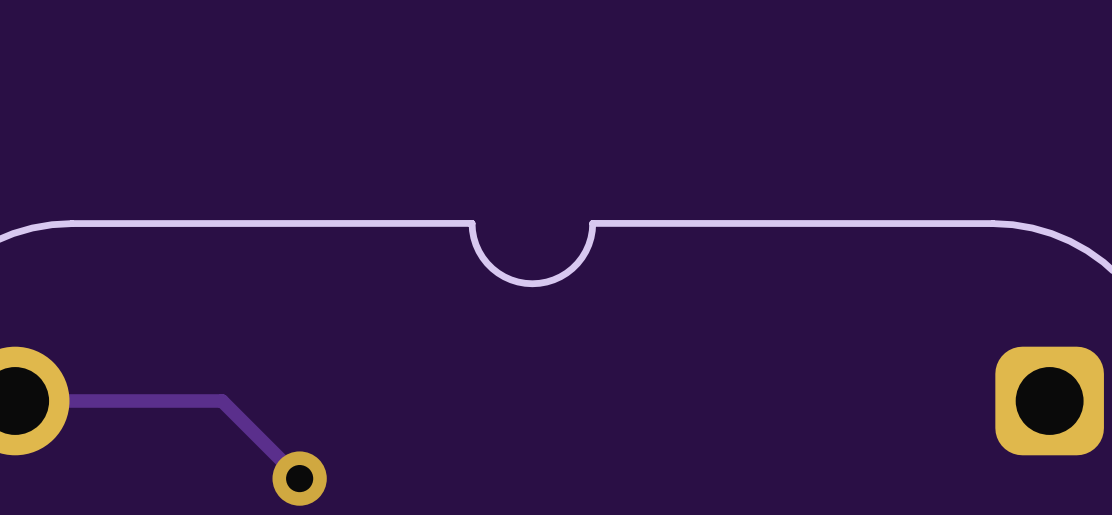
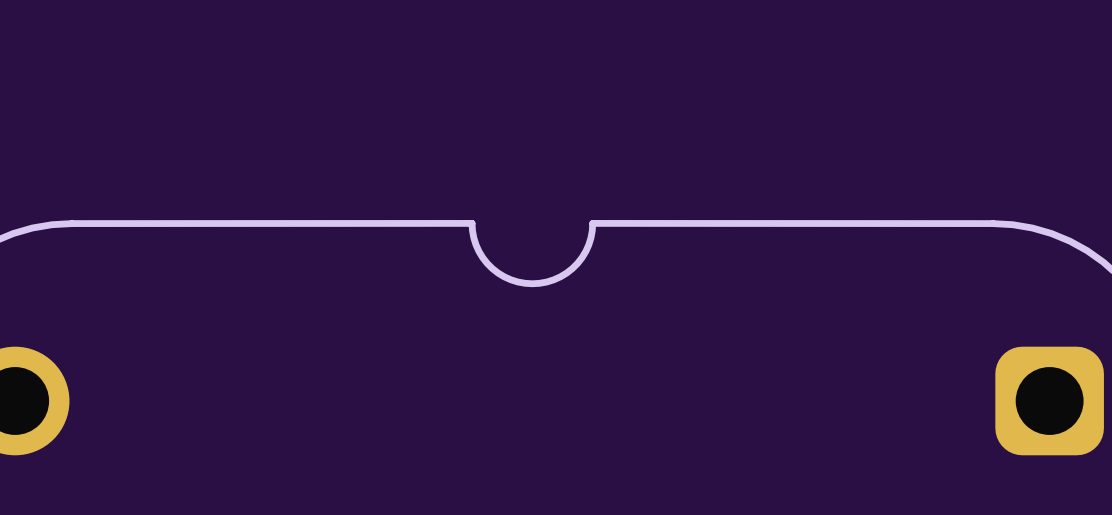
track: (15, 400) (222, 400) (299, 478) -> none
via: (299, 478) -> none

